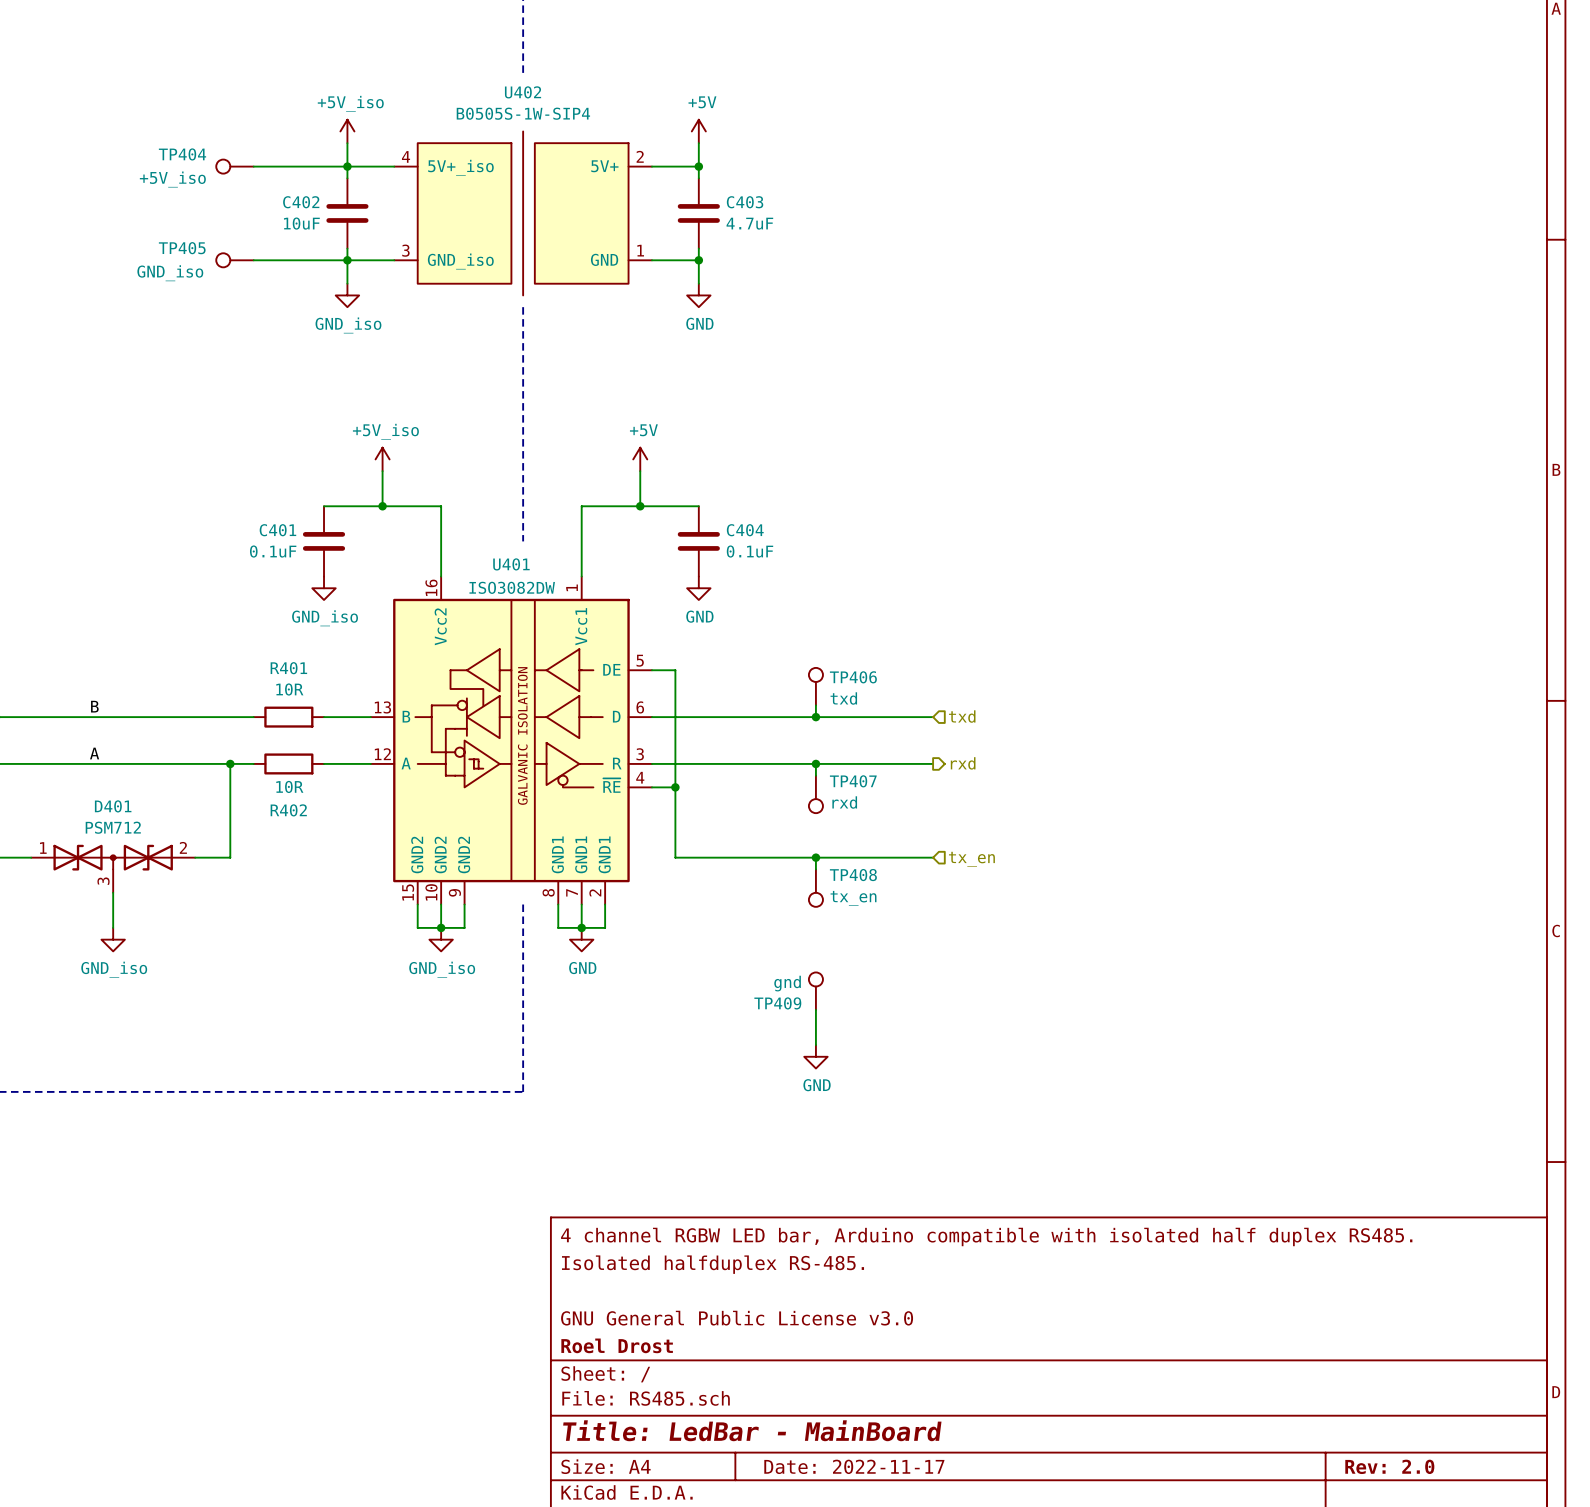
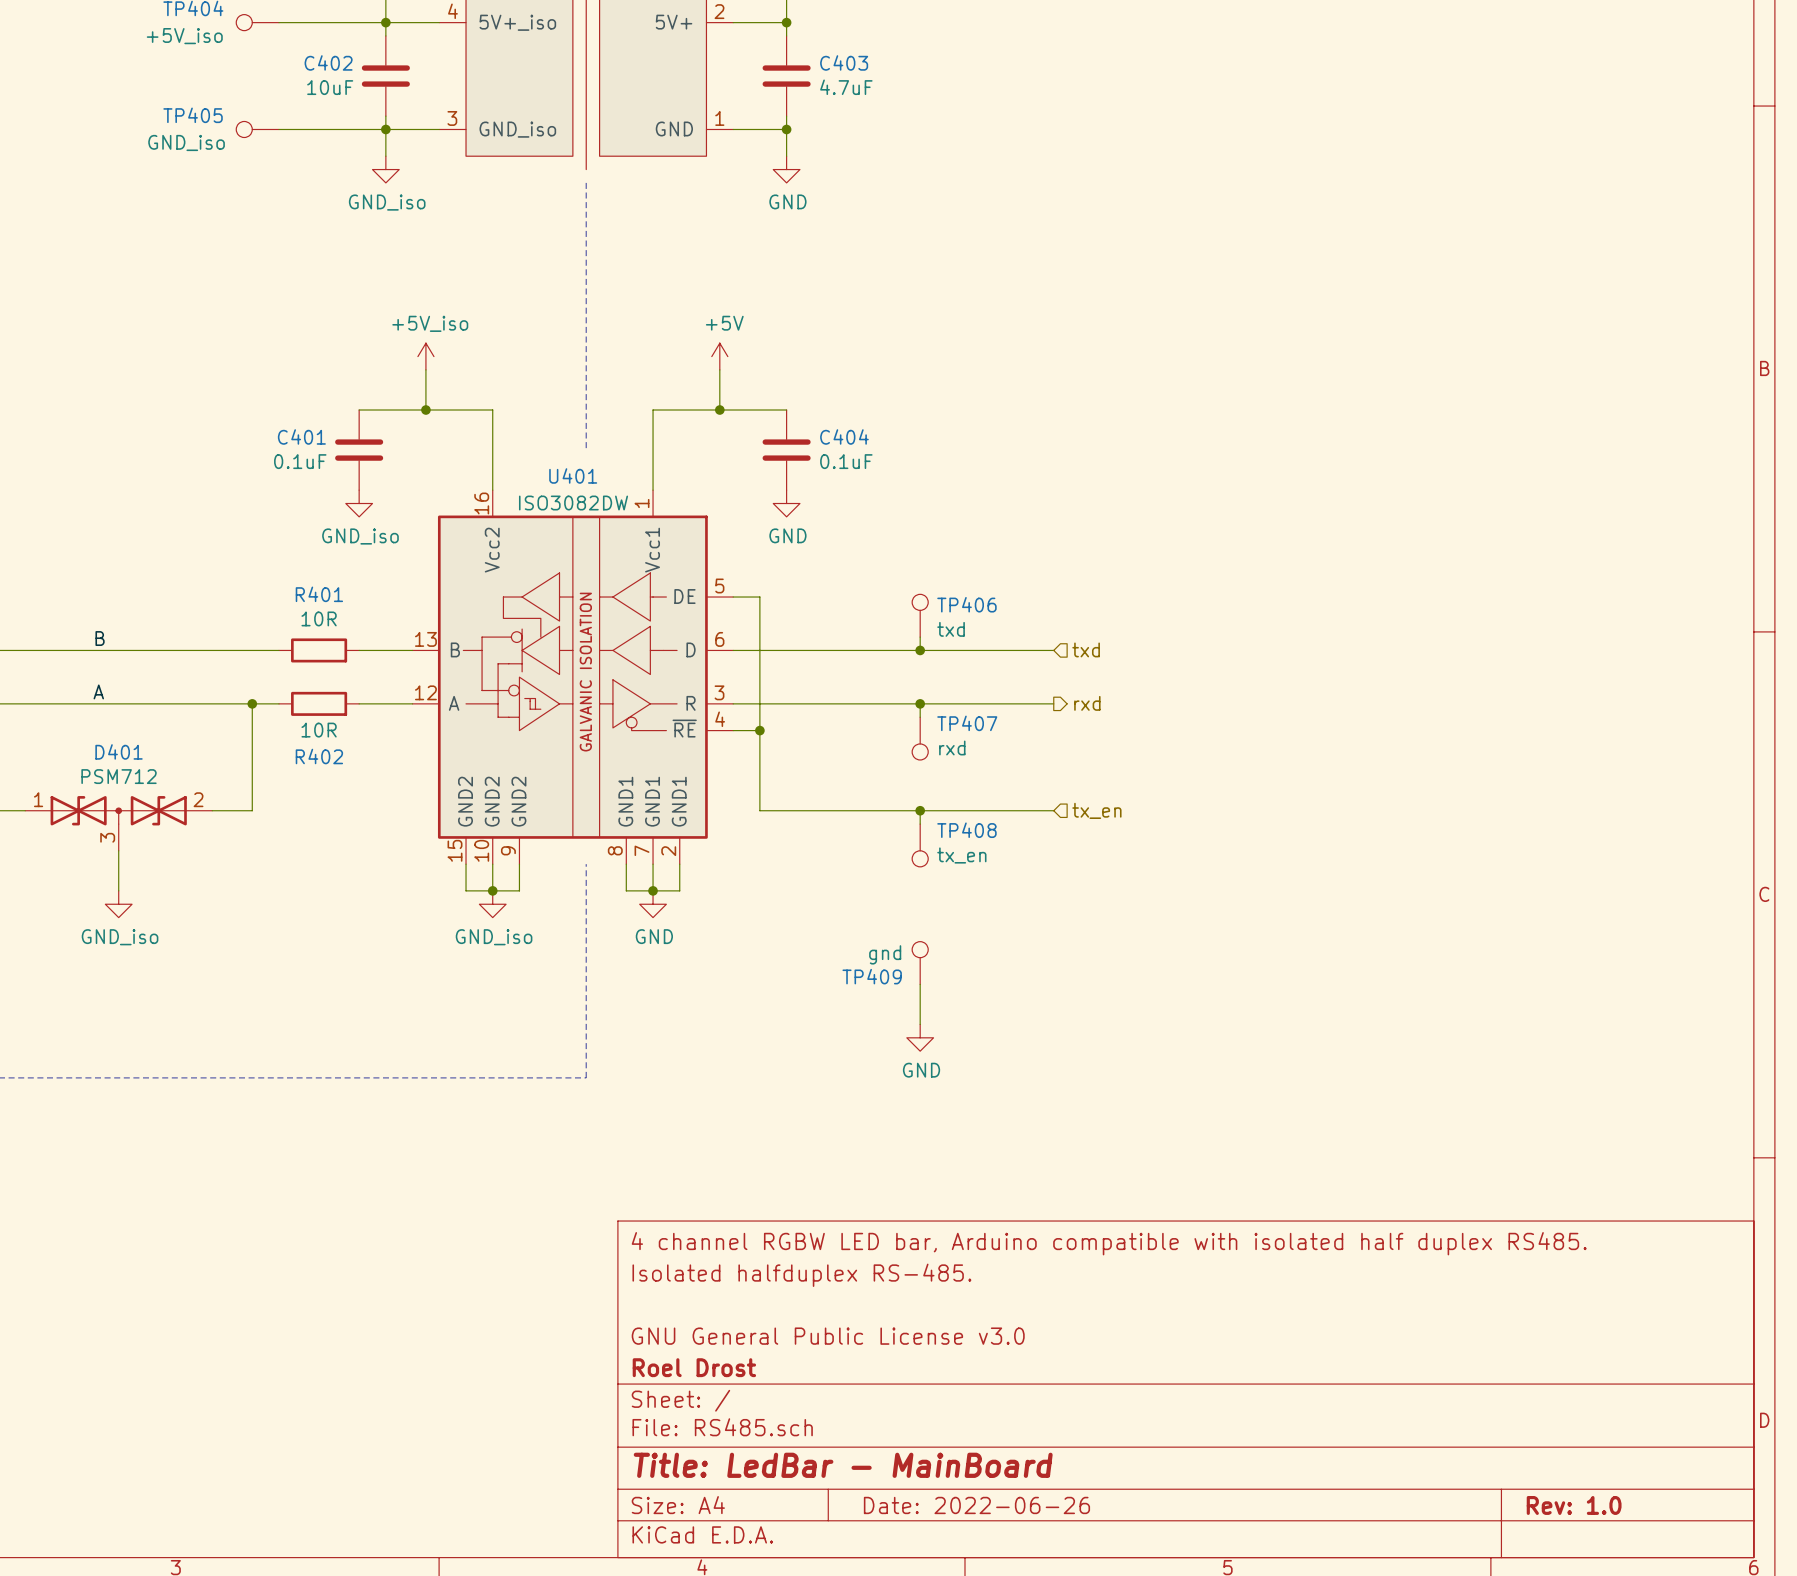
title block: Date: 2022-11-17 (854, 1466) -> Date: 2022-06-26 (976, 1505)
title block: Rev: 2.0 (1389, 1466) -> Rev: 1.0 (1574, 1505)

